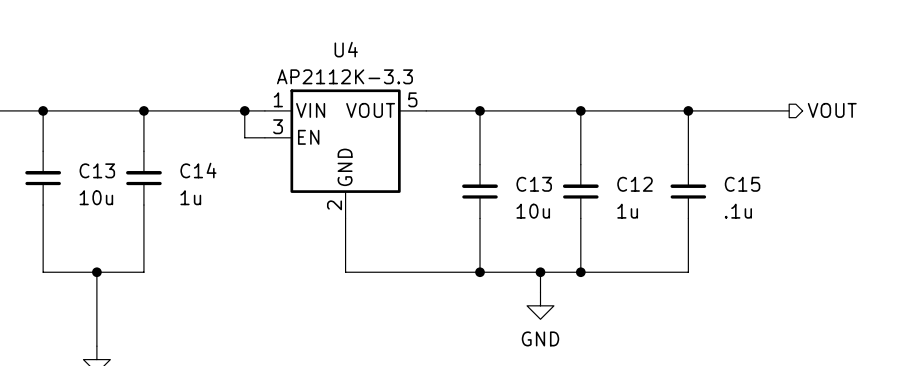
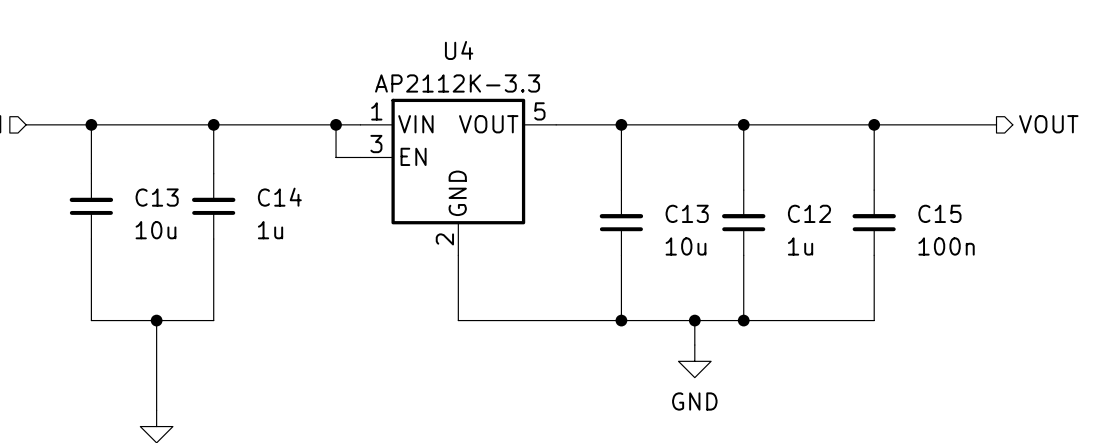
C15 value: .1u (738, 211) -> 100n (946, 246)

